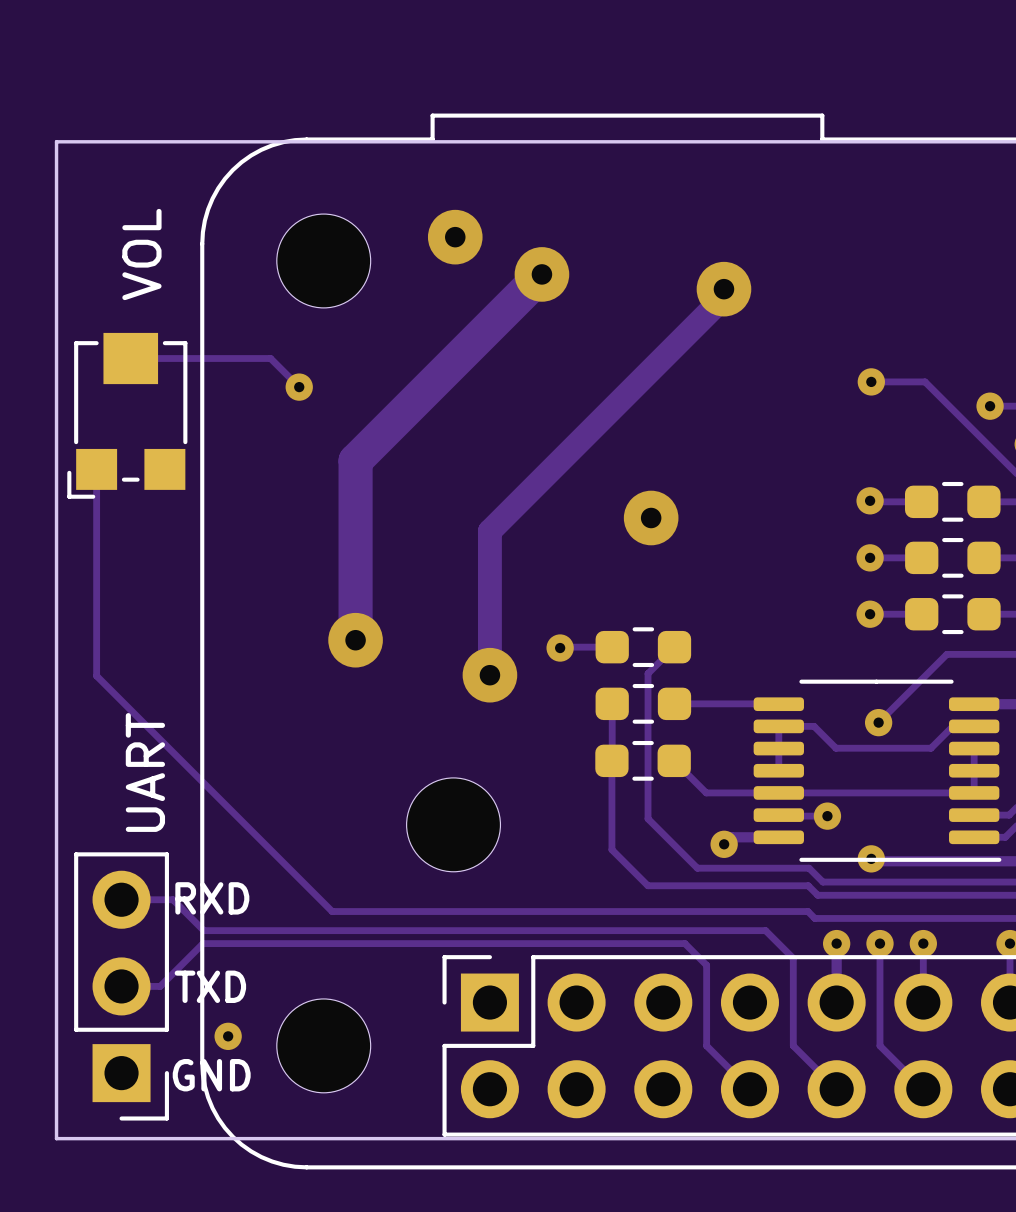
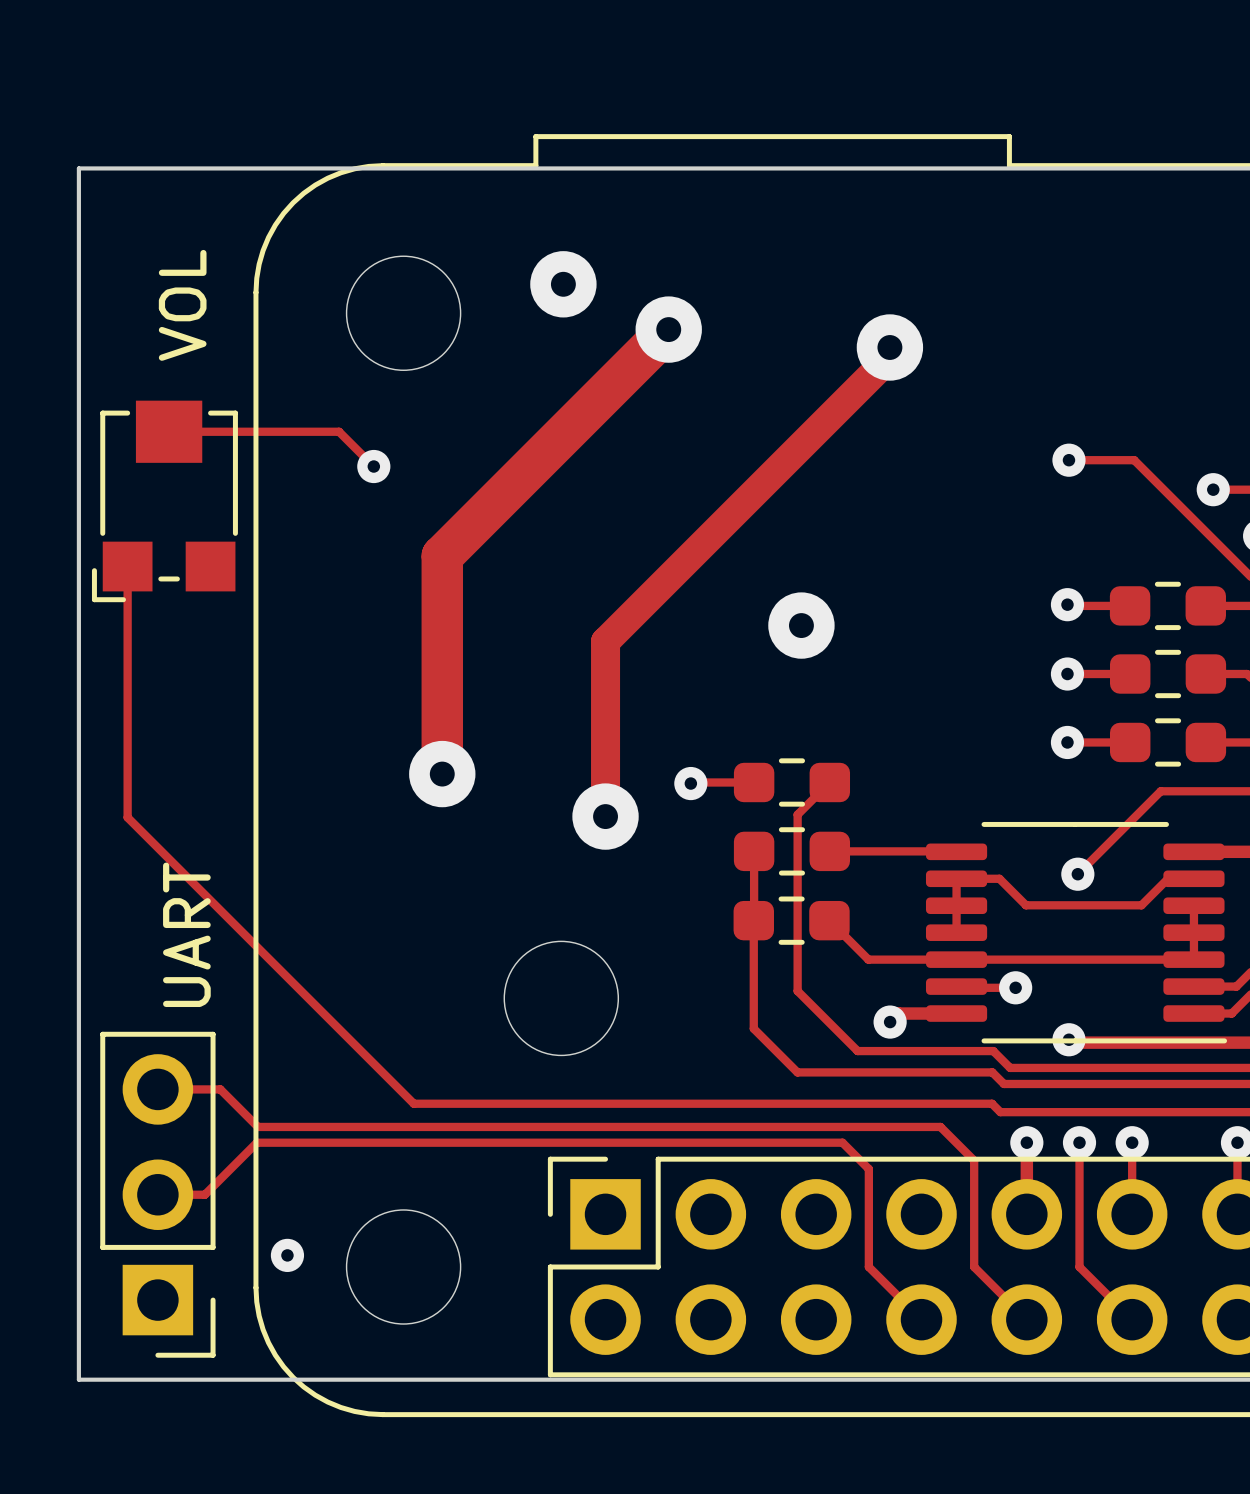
text: RXD (212, 898) -> none
text: TXD (210, 986) -> none
text: GND (211, 1075) -> none

